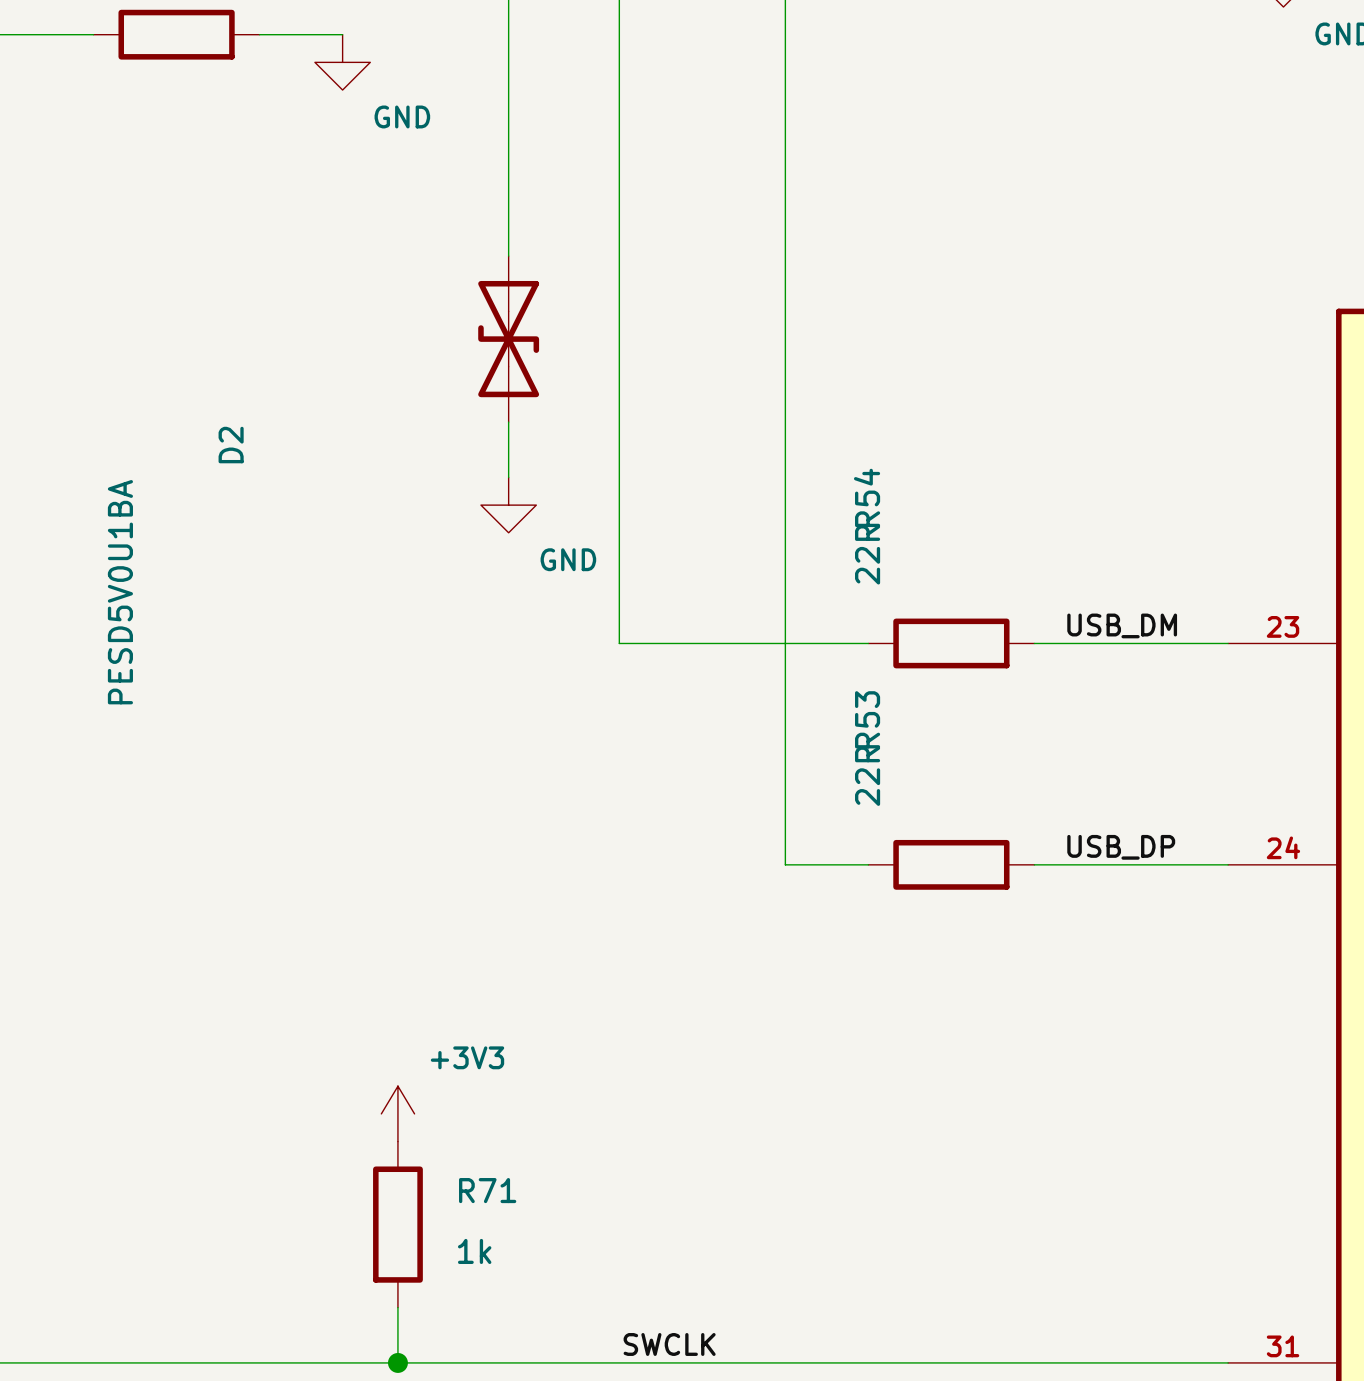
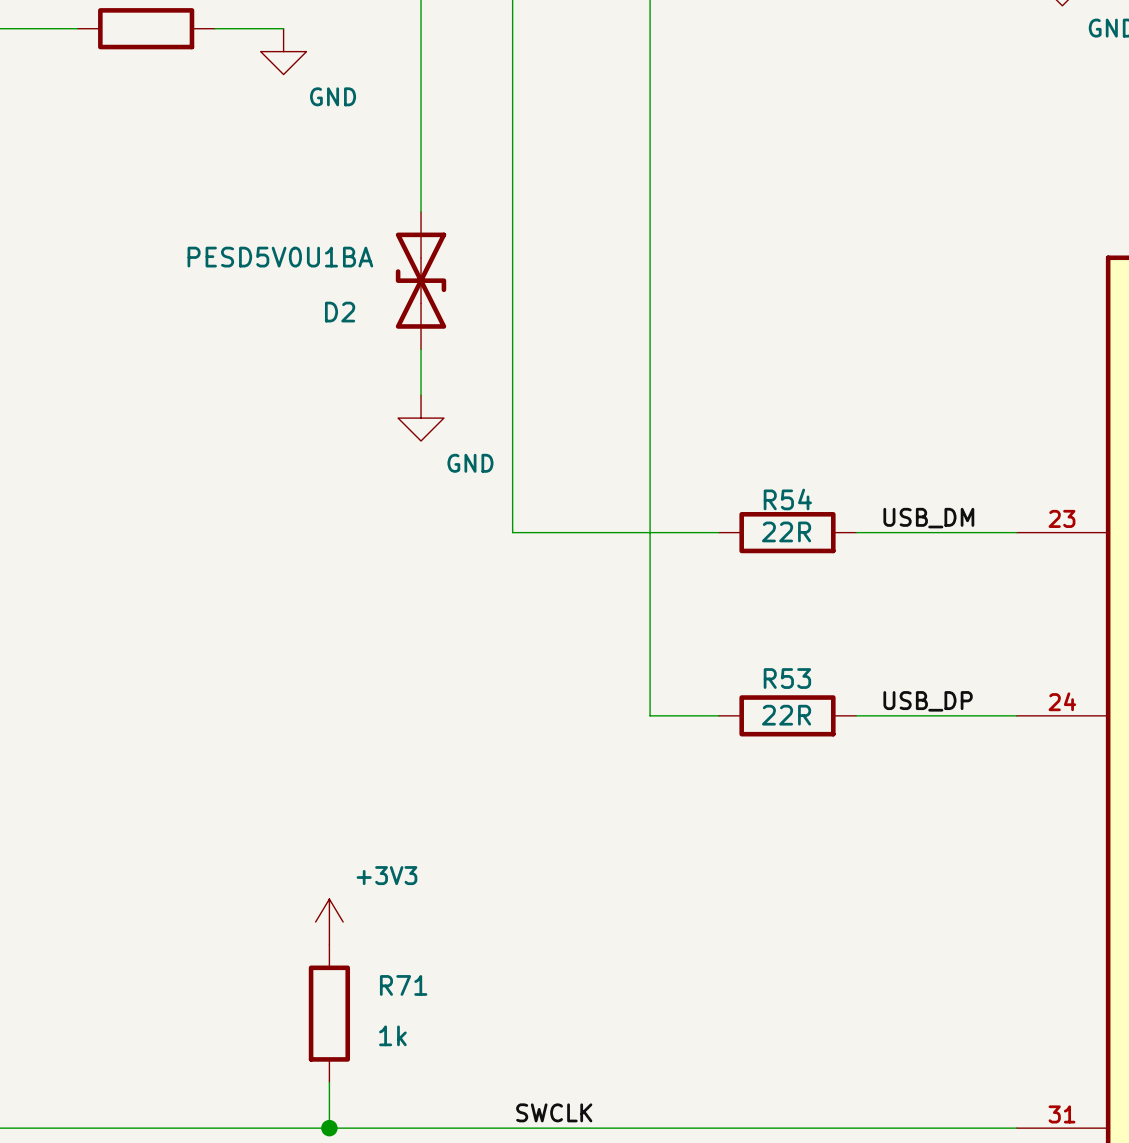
D2 name rotation: 0° (231, 445) -> 90° clockwise (340, 312)
D2 name position: D2 (231, 445) -> D2 (340, 312)
R54 name rotation: 0° (867, 497) -> 90° clockwise (787, 499)
R54 name position: R54 (867, 497) -> R54 (787, 499)
R54 value rotation: 0° (867, 554) -> 90° clockwise (786, 531)
R54 value position: 22R (867, 554) -> 22R (786, 531)
D2 value rotation: 0° (120, 592) -> 90° clockwise (280, 257)
D2 value position: PESD5V0U1BA (120, 592) -> PESD5V0U1BA (280, 257)
R53 name rotation: 0° (867, 719) -> 90° clockwise (787, 678)
R53 name position: R53 (867, 719) -> R53 (787, 678)
R53 value rotation: 0° (867, 776) -> 90° clockwise (786, 715)
R53 value position: 22R (867, 776) -> 22R (786, 715)

